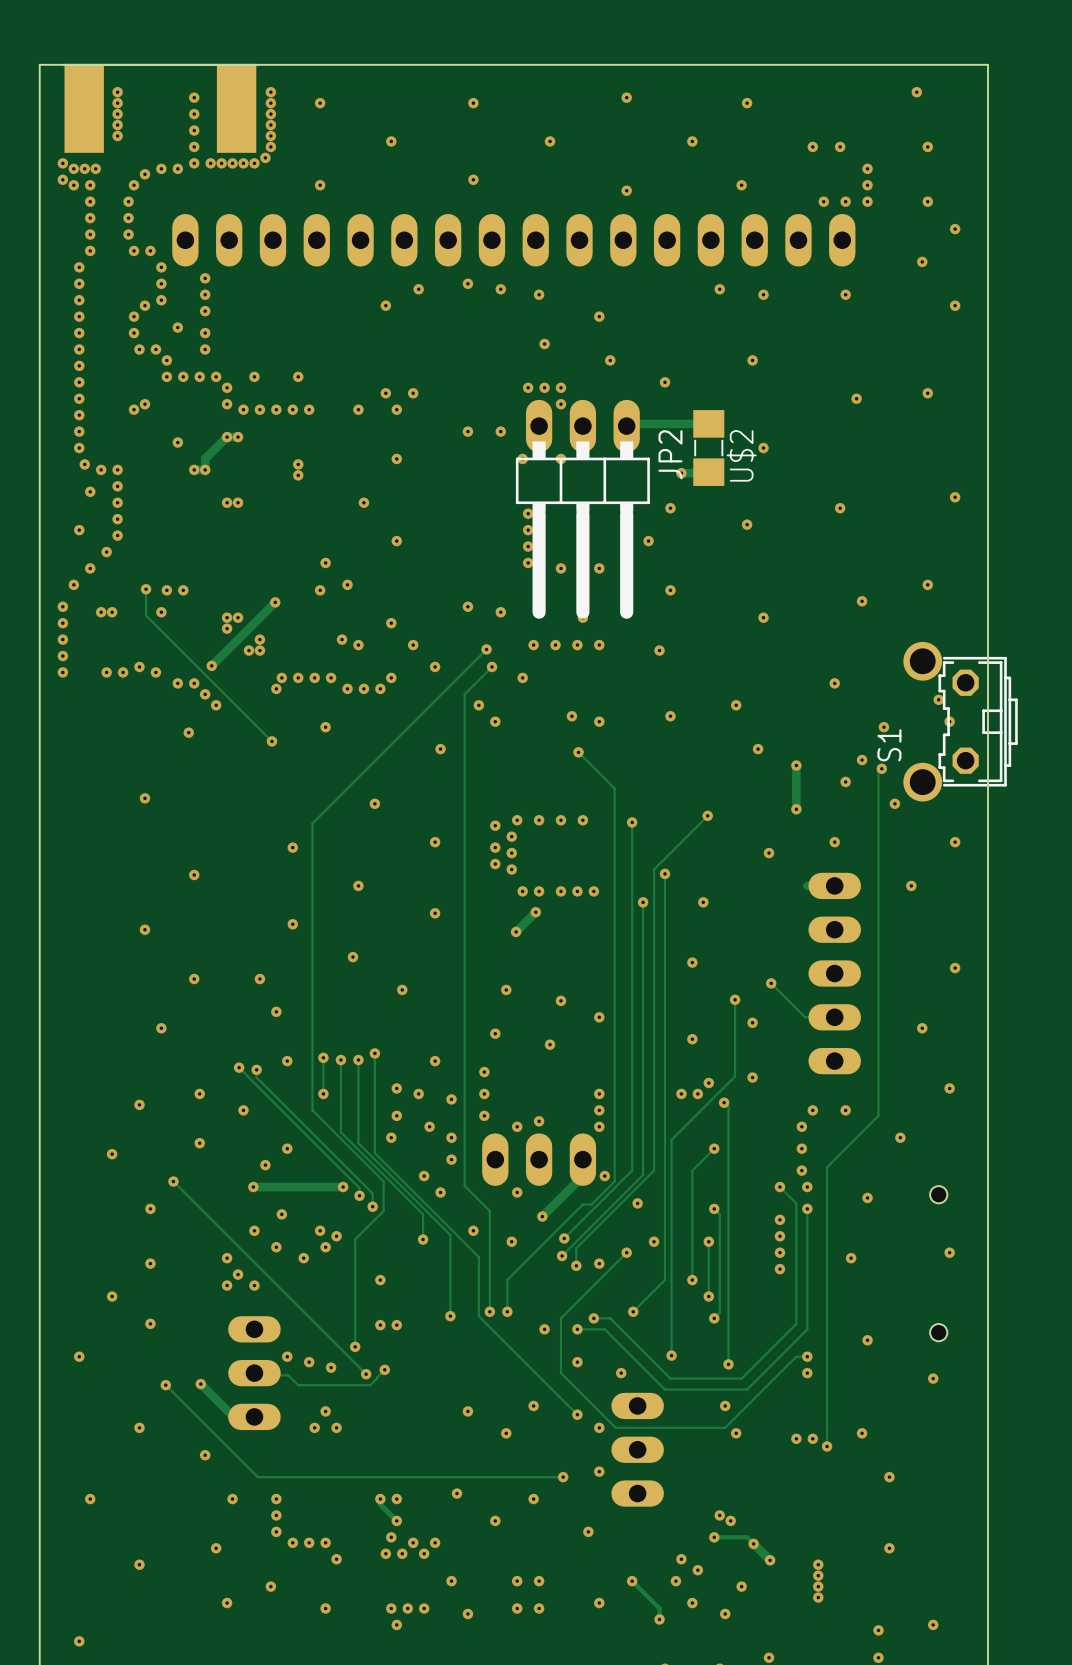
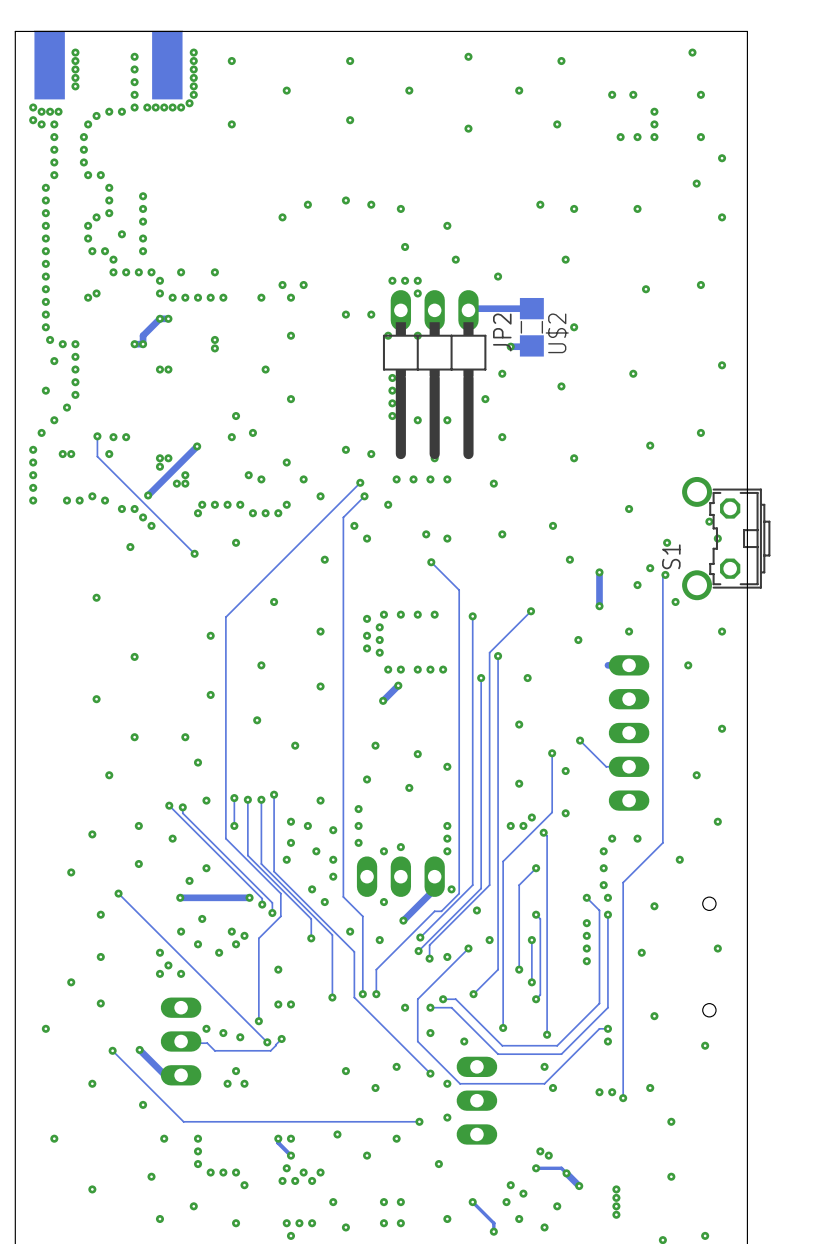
part: (513, 240) -> none
via: (177, 442) -> none

